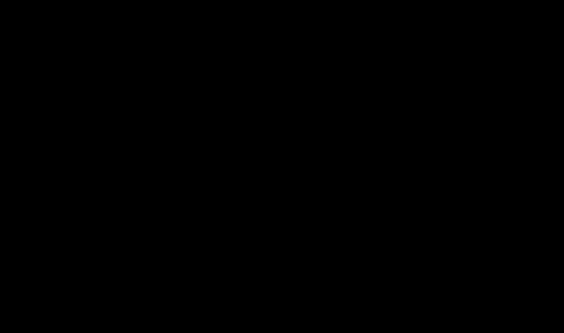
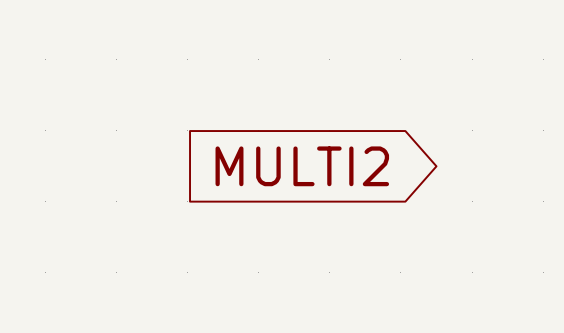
global label: none -> MULTI2 (302, 166)

